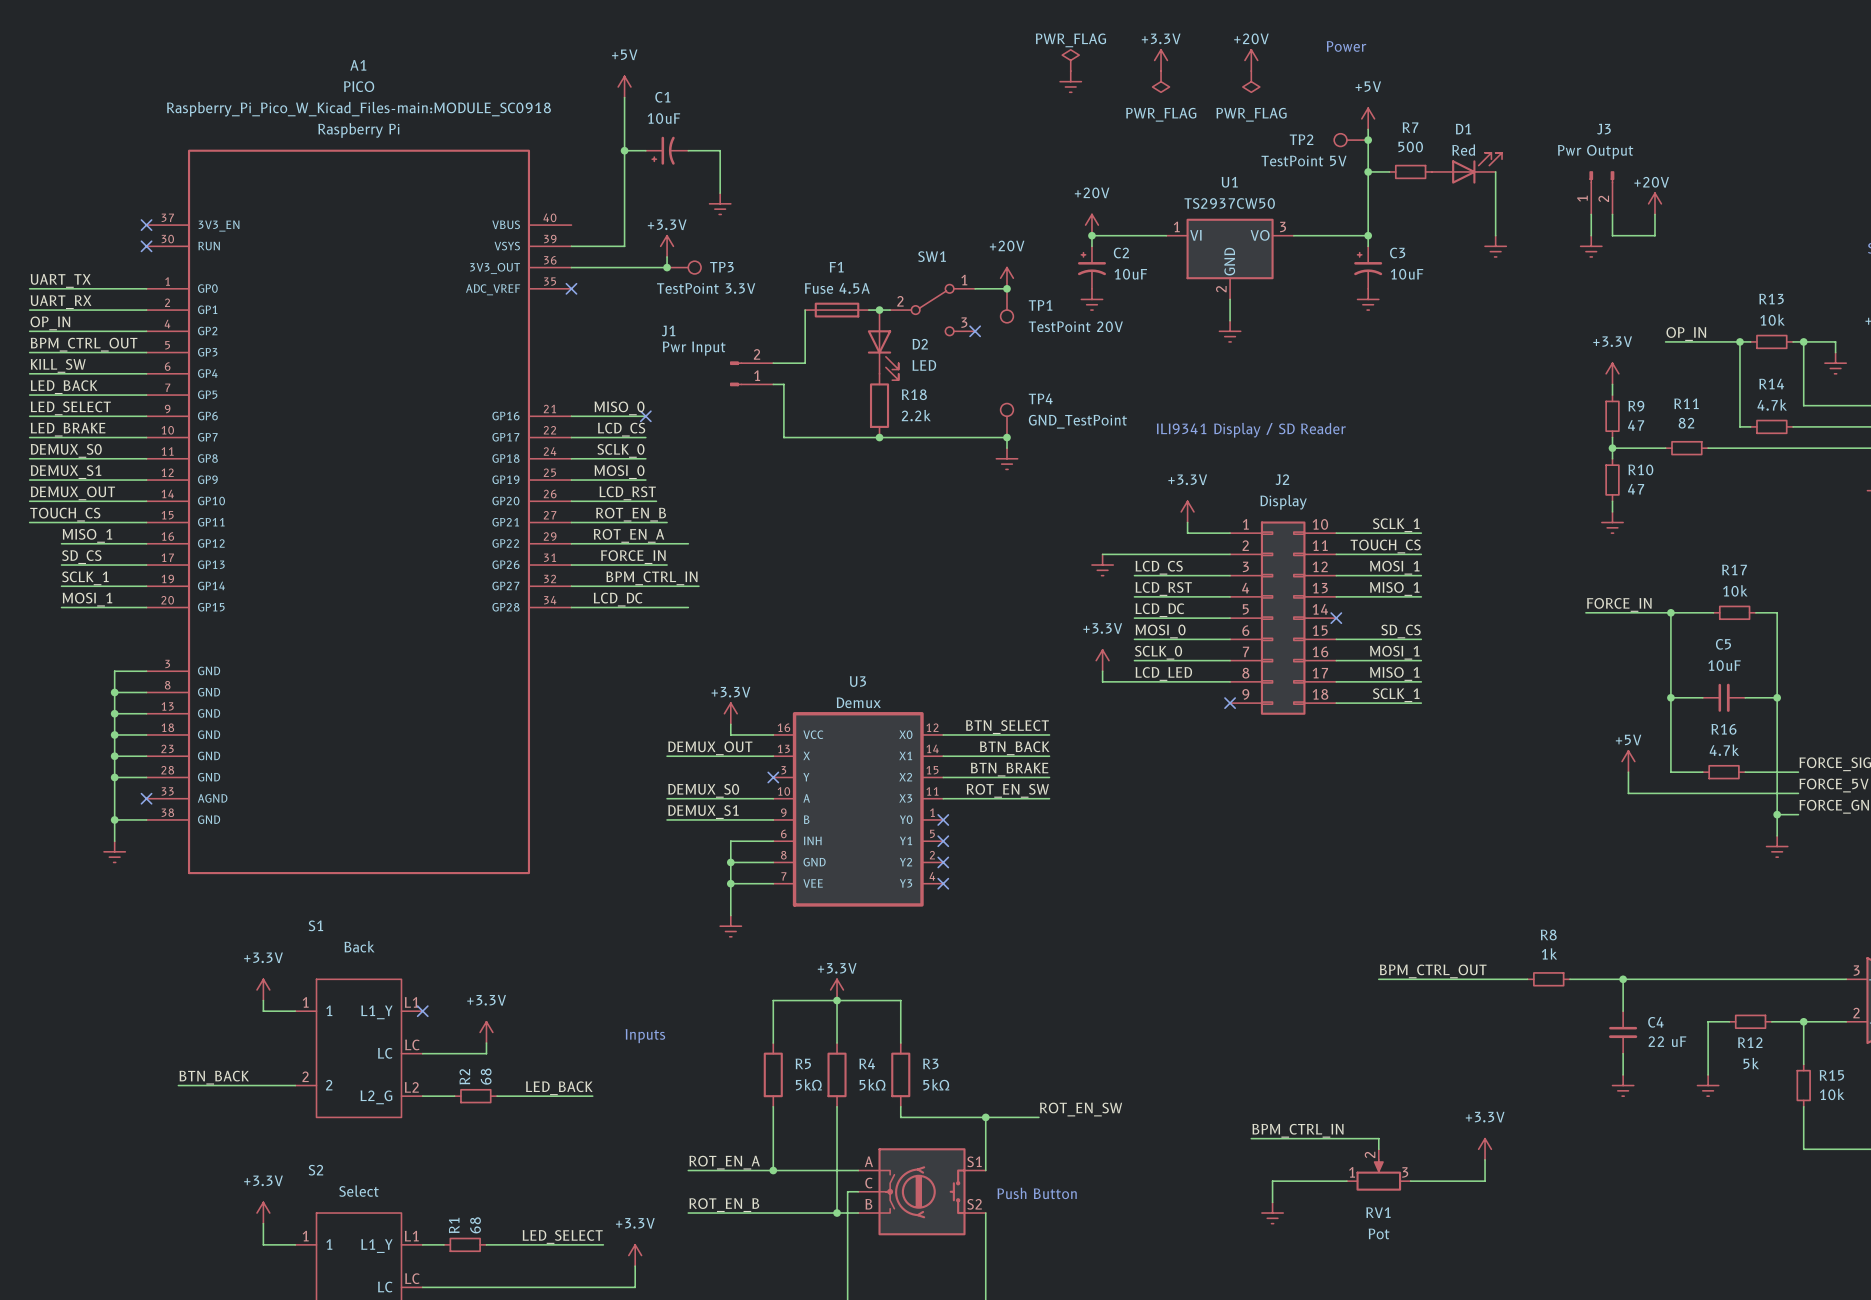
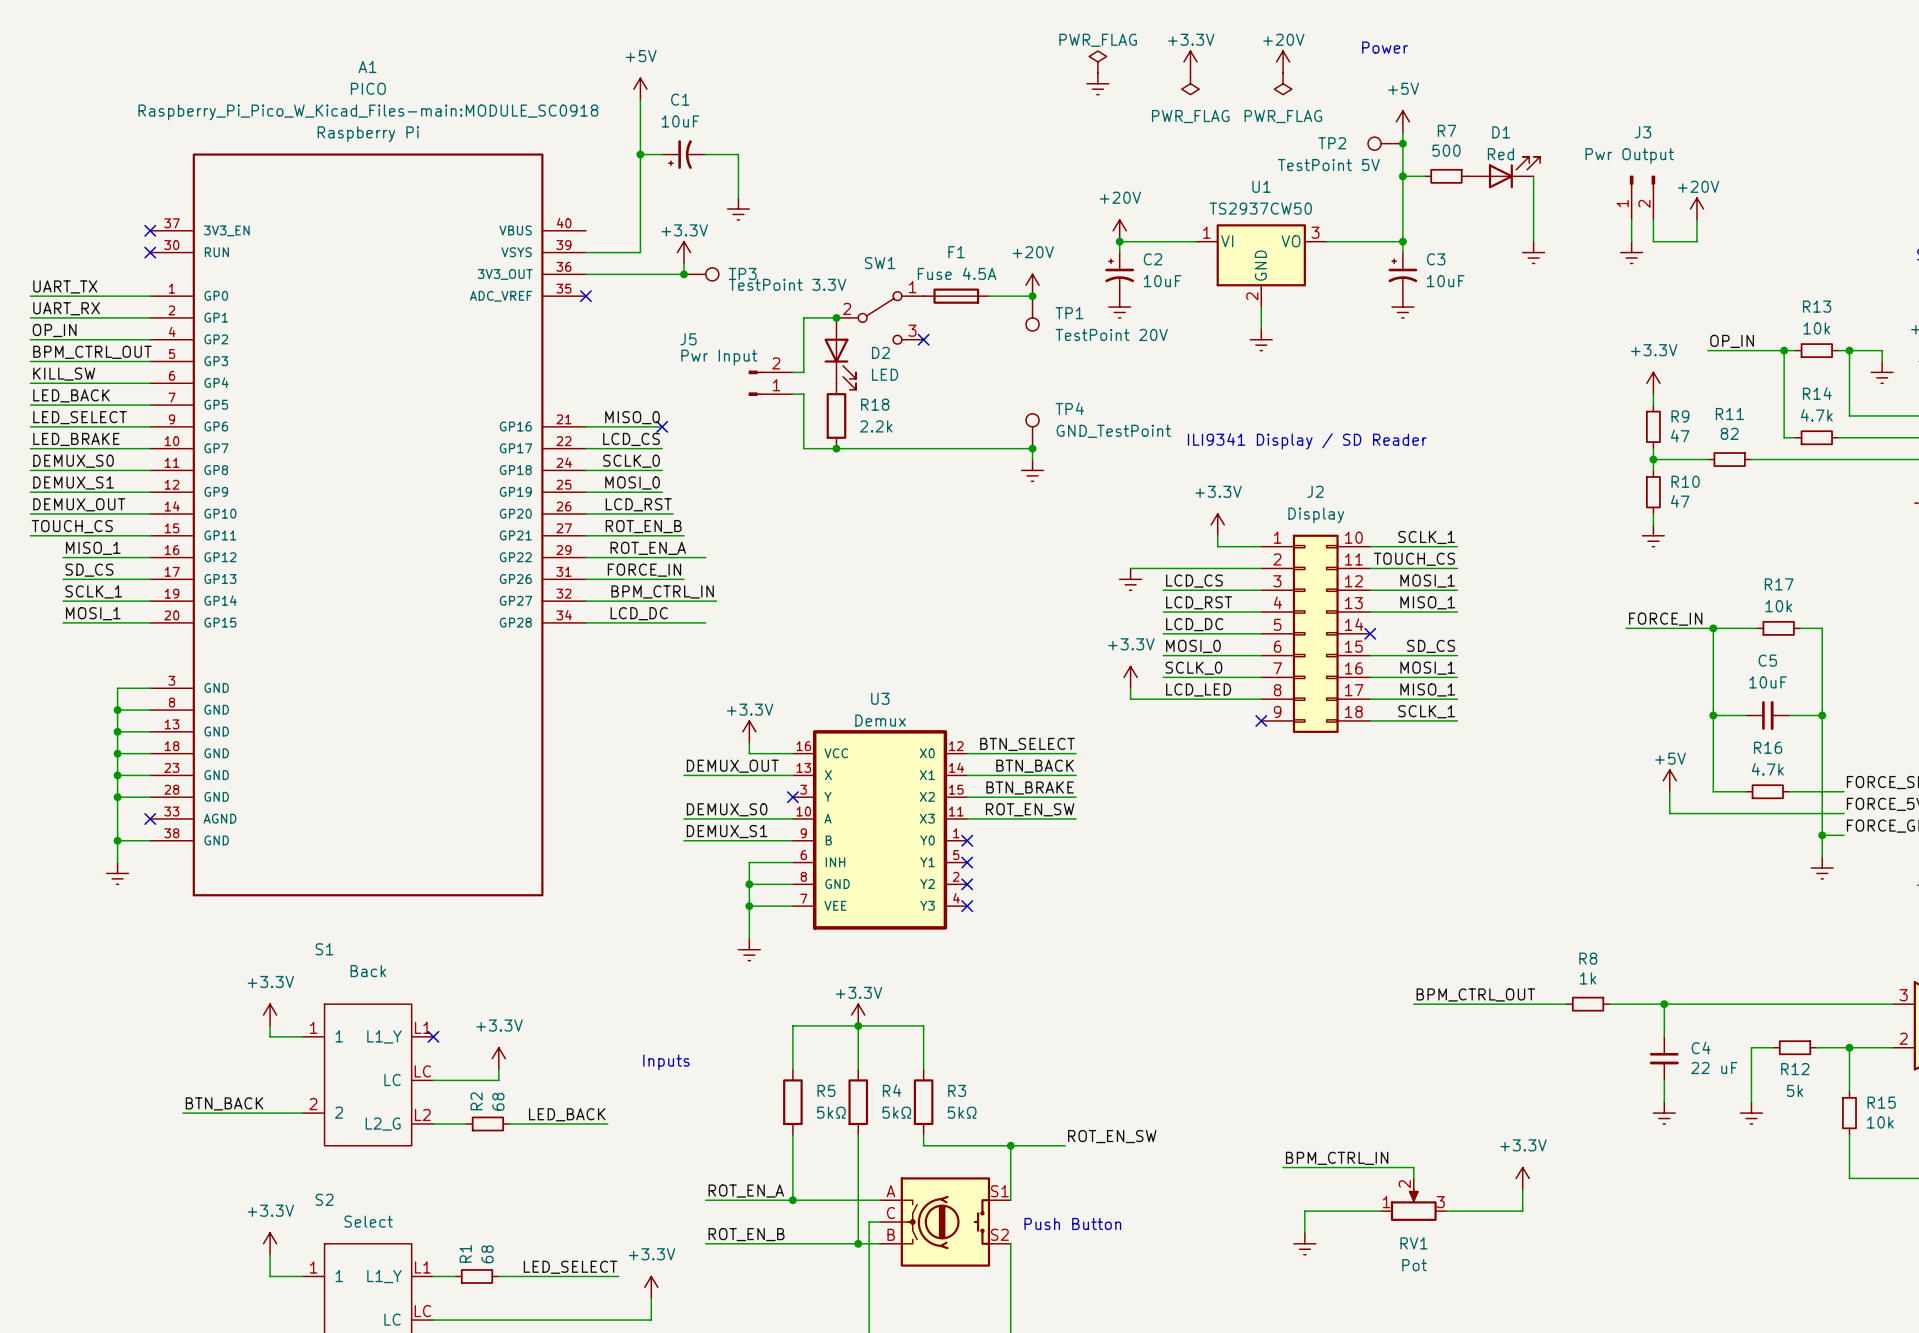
TP3 value position: TestPoint 3.3V (706, 288) -> TestPoint 3.3V (787, 284)
wire: (805, 310) (805, 363) (783, 363) -> (836, 317) (803, 317) (803, 372)
junction: none -> (836, 317)
F1 position: (837, 310) -> (956, 296)
wire: (868, 310) (890, 310) -> none
junction: (879, 310) -> none
SW1 position: (932, 310) -> (880, 317)
J1 name: J1 (668, 330) -> J5 (688, 339)
no-connect mark: none -> (923, 339)
no-connect mark: (975, 331) -> none
D2 position: (883, 345) -> (840, 353)
R18 position: (879, 405) -> (836, 415)
junction: none -> (836, 448)
junction: (879, 437) -> none

